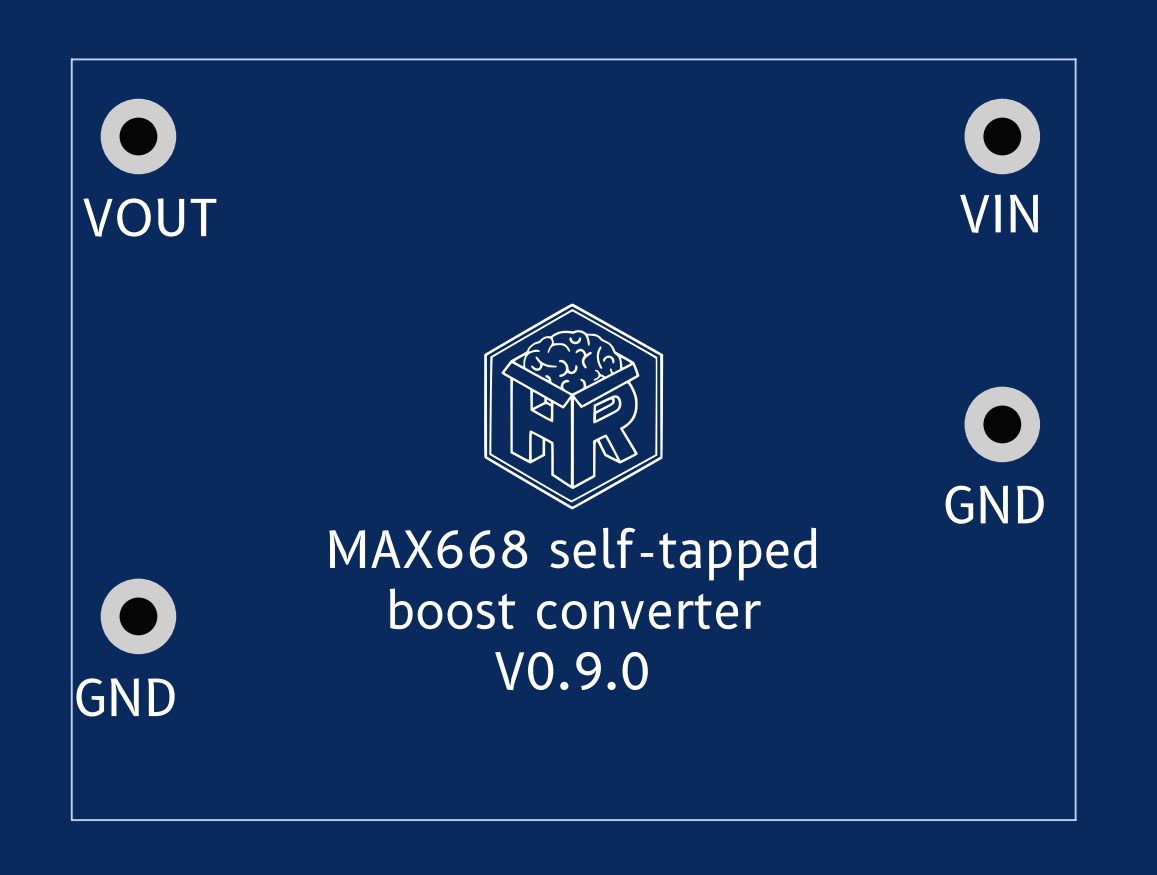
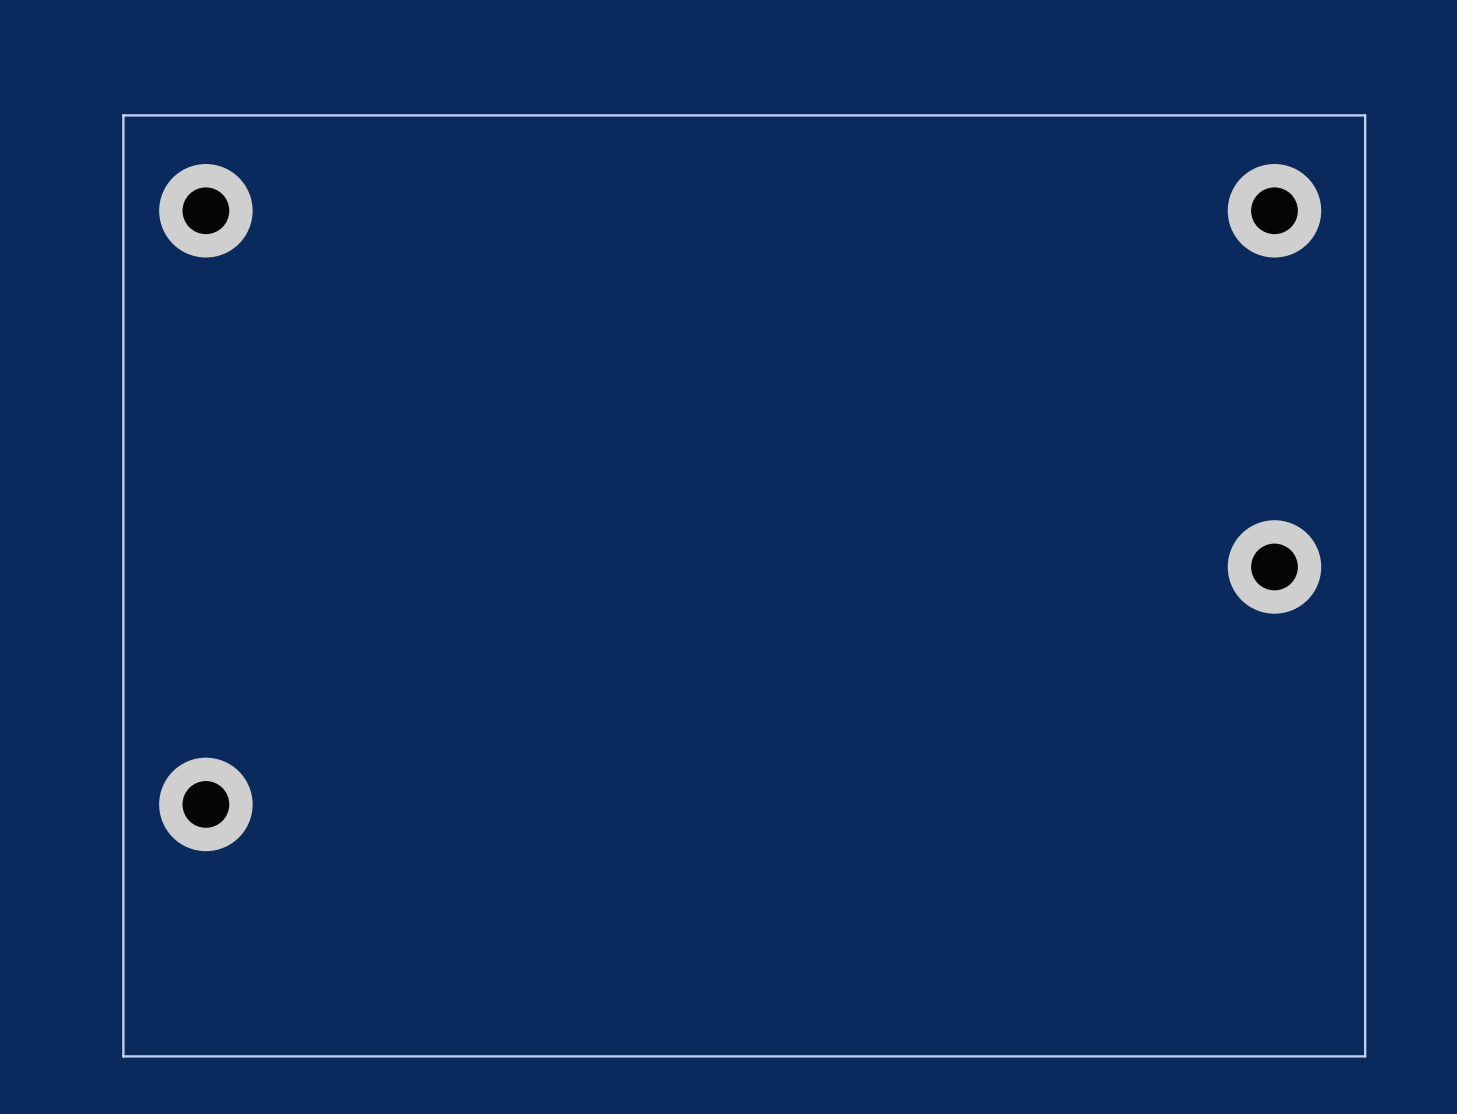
text: VIN (999, 213) -> none
text: VOUT (149, 217) -> none
drawing: [484, 303, 664, 510] -> none
text: GND (994, 504) -> none
text: MAX668 self-tapped (572, 554) -> none
text: boost converter (575, 608) -> none
text: V0.9.0 (571, 670) -> none
text: GND (125, 697) -> none

